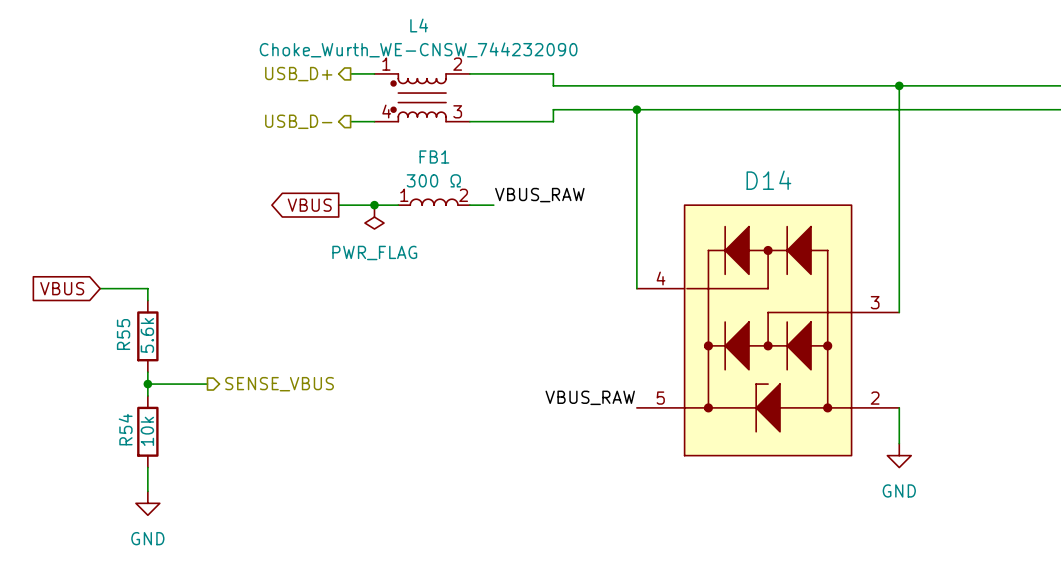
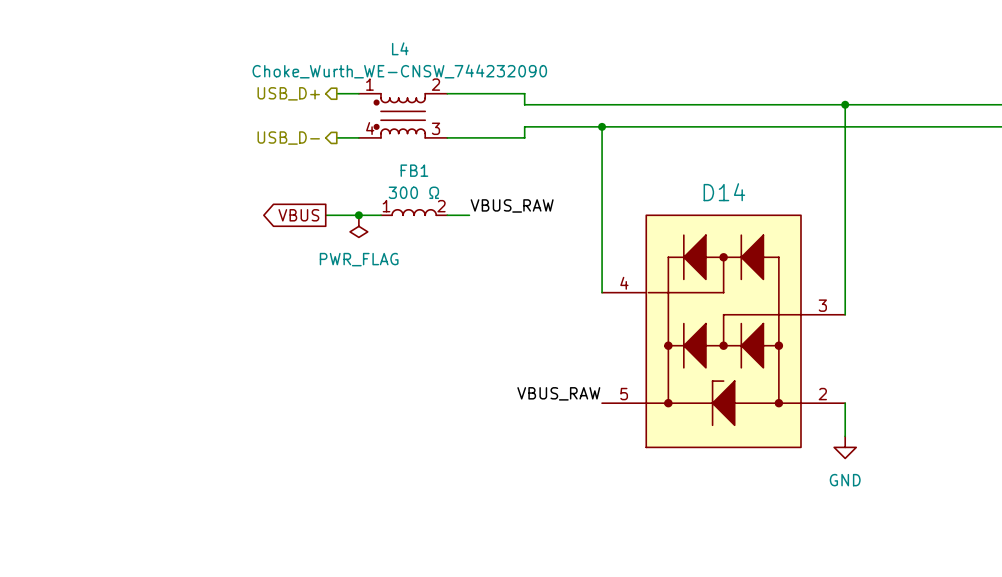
global label: VBUS (62, 288) -> none
wire: (100, 288) (147, 288) (147, 300) -> none
R55: 5.6k (147, 336) -> none
wire: (147, 372) (147, 395) -> none
wire: (147, 384) (207, 384) -> none
junction: (147, 384) -> none
hierarchical label: SENSE_VBUS (279, 384) -> none
R54: 10k (147, 431) -> none
wire: (147, 467) (147, 491) -> none
power symbol: GND (147, 503) -> none

